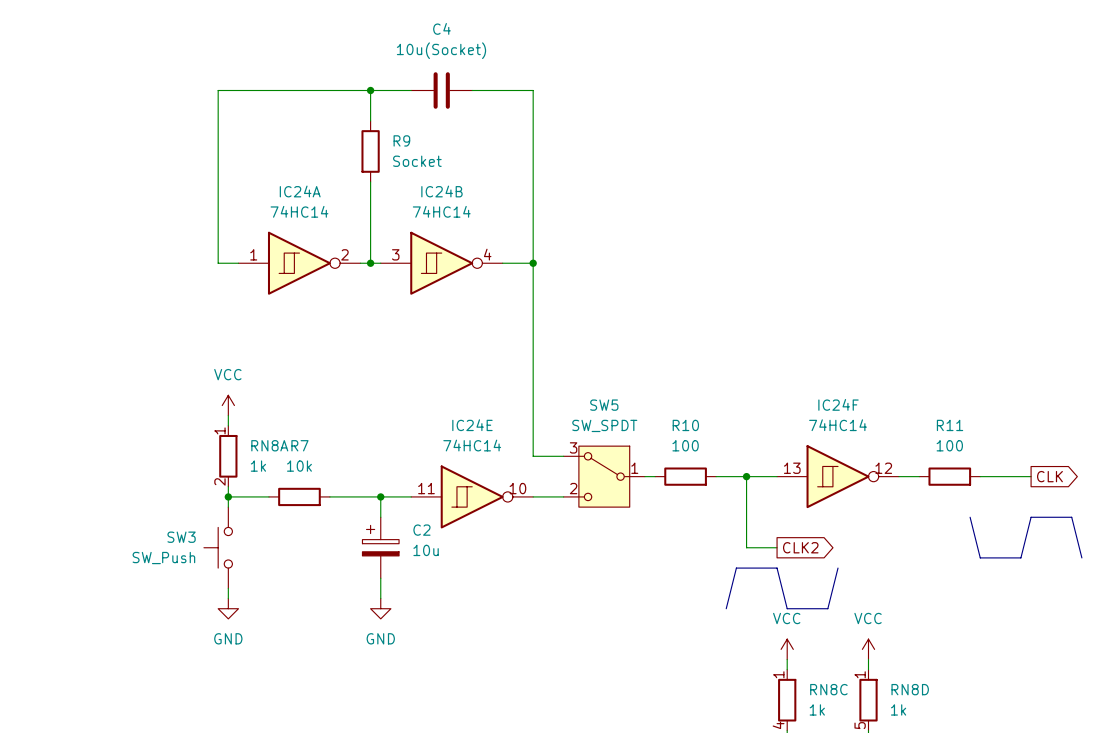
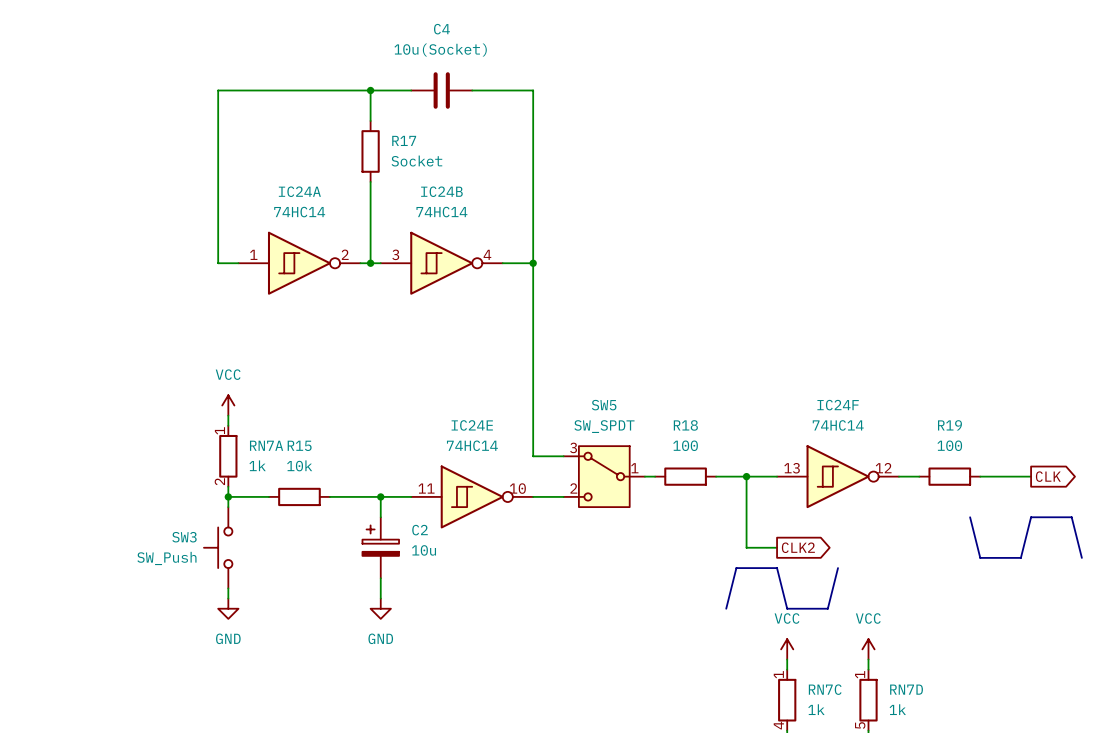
R9 name: R9 (401, 140) -> R17 (404, 140)
R10 name: R10 (685, 425) -> R18 (685, 425)
R11 name: R11 (950, 425) -> R19 (949, 425)
RN8A name: RN8A (269, 445) -> RN7A (266, 445)
R7 name: R7 (299, 445) -> R15 (299, 445)
RN8C name: RN8C (828, 689) -> RN7C (825, 689)
RN8D name: RN8D (910, 689) -> RN7D (906, 689)

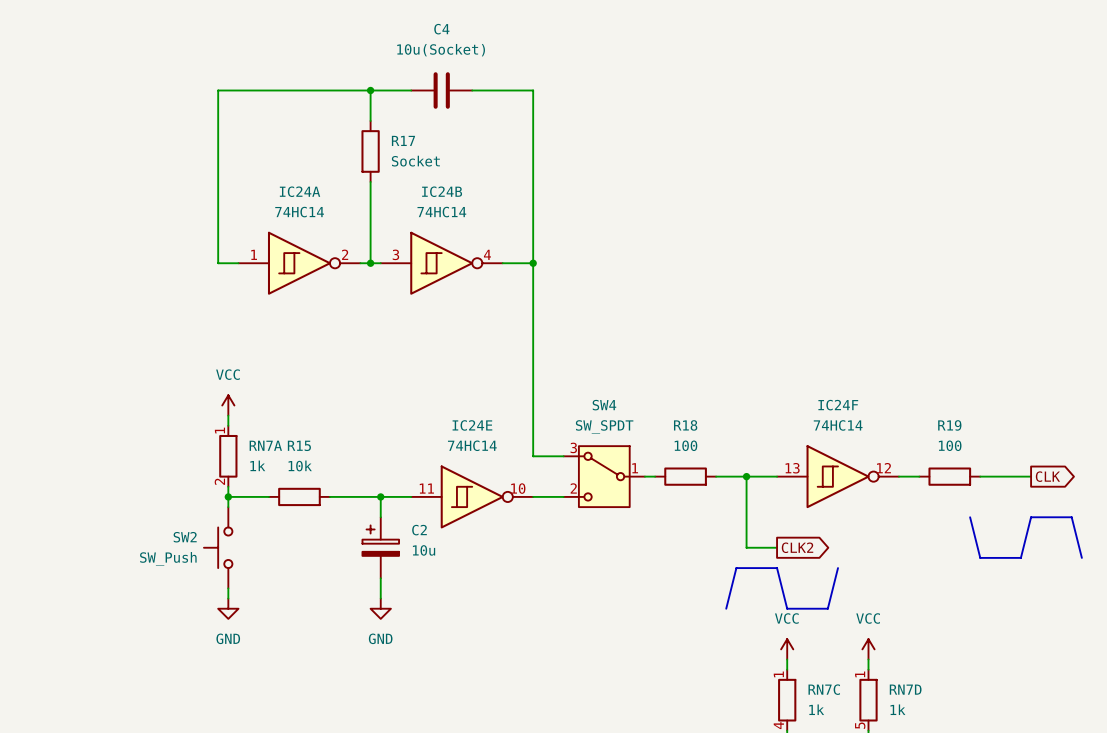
SW5 name: SW5 (604, 405) -> SW4 (604, 405)
SW3 name: SW3 (184, 537) -> SW2 (185, 537)

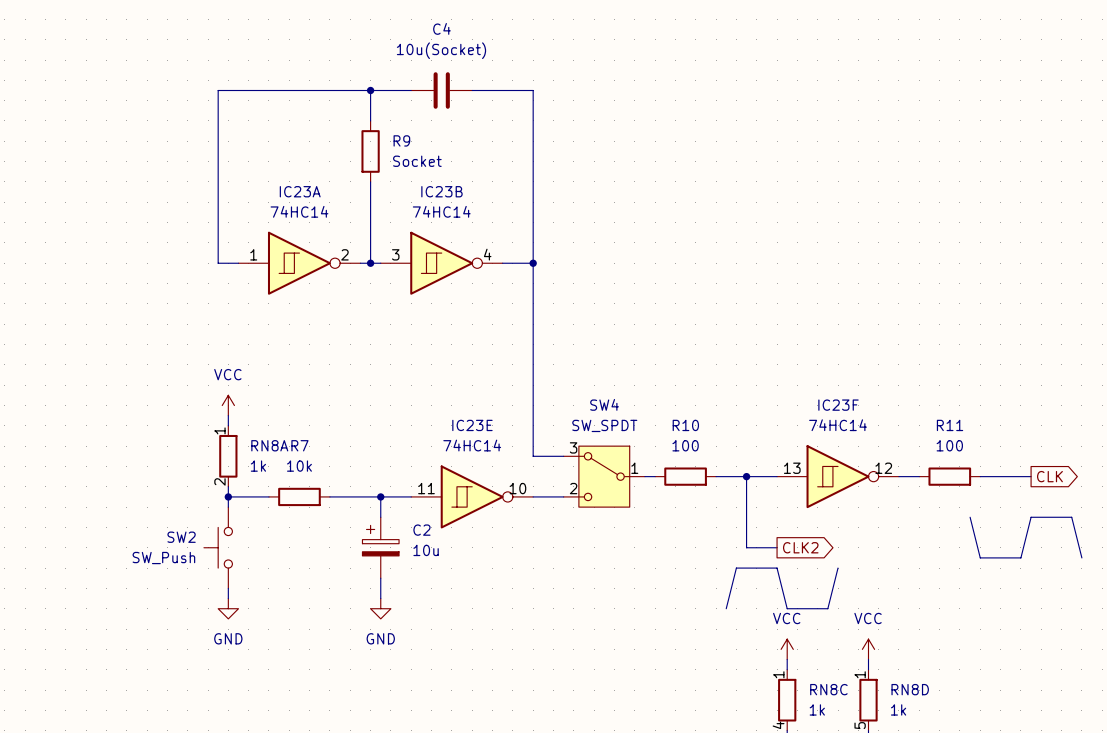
R17 name: R17 (403, 140) -> R9 (401, 140)
IC24A name: IC24A (300, 191) -> IC23A (300, 191)
IC24B name: IC24B (442, 191) -> IC23B (441, 191)
IC24F name: IC24F (838, 405) -> IC23F (838, 405)
IC24E name: IC24E (472, 425) -> IC23E (472, 425)
R18 name: R18 (685, 425) -> R10 (685, 425)
R19 name: R19 (949, 425) -> R11 (950, 425)
RN7A name: RN7A (265, 445) -> RN8A (269, 445)
R15 name: R15 (299, 445) -> R7 (299, 445)
RN7C name: RN7C (824, 689) -> RN8C (828, 689)
RN7D name: RN7D (905, 689) -> RN8D (910, 689)

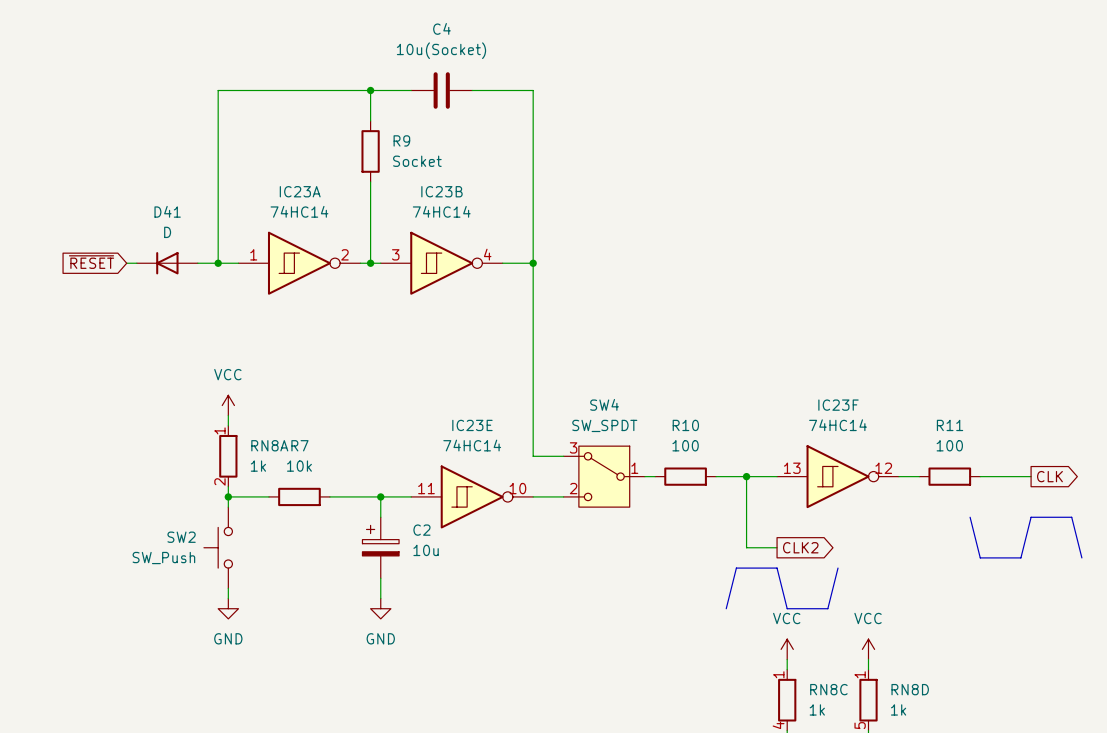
global label: none -> ~{RESET} (91, 262)
wire: none -> (126, 263) (136, 263)
D41: none -> D (167, 263)
wire: none -> (197, 263) (218, 263)
junction: none -> (218, 263)

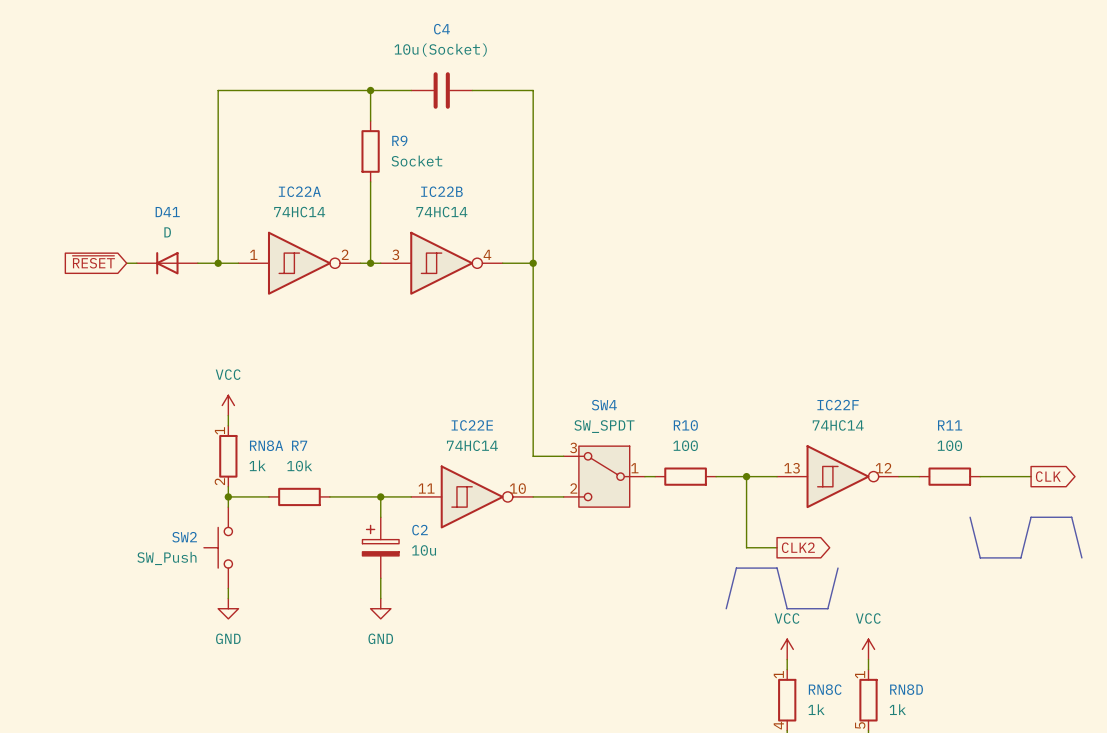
IC23A name: IC23A (300, 191) -> IC22A (299, 191)
IC23B name: IC23B (441, 191) -> IC22B (441, 191)
IC23F name: IC23F (838, 405) -> IC22F (838, 405)
IC23E name: IC23E (472, 425) -> IC22E (472, 425)

